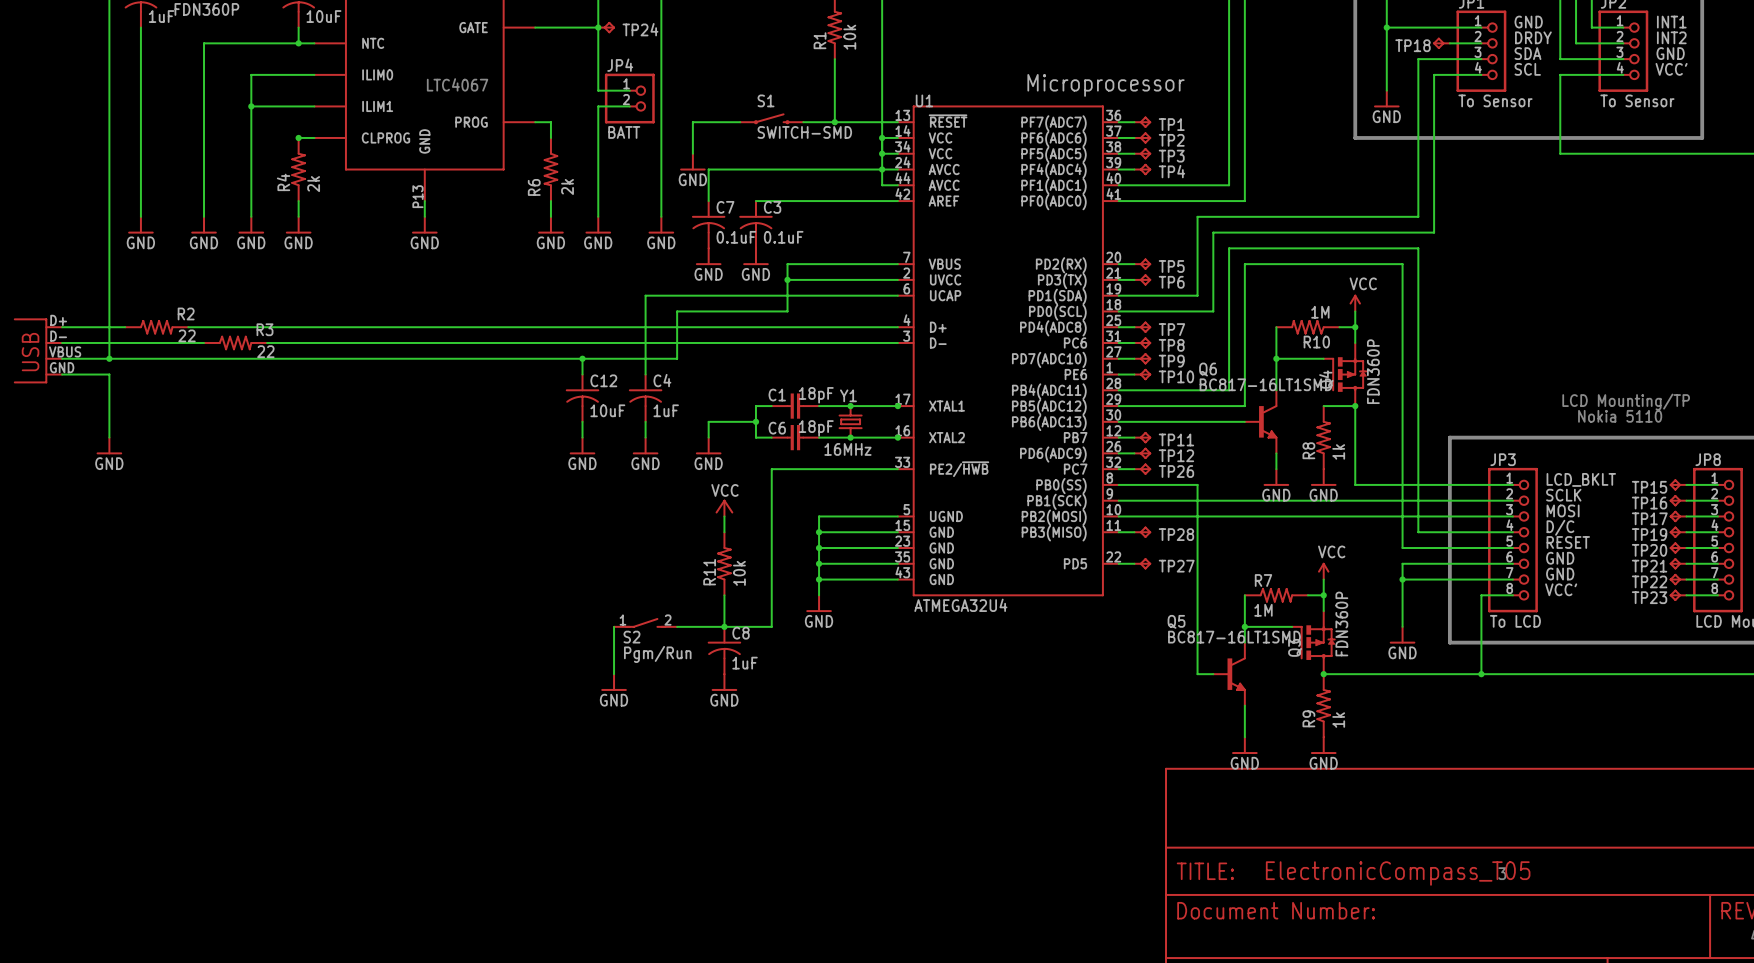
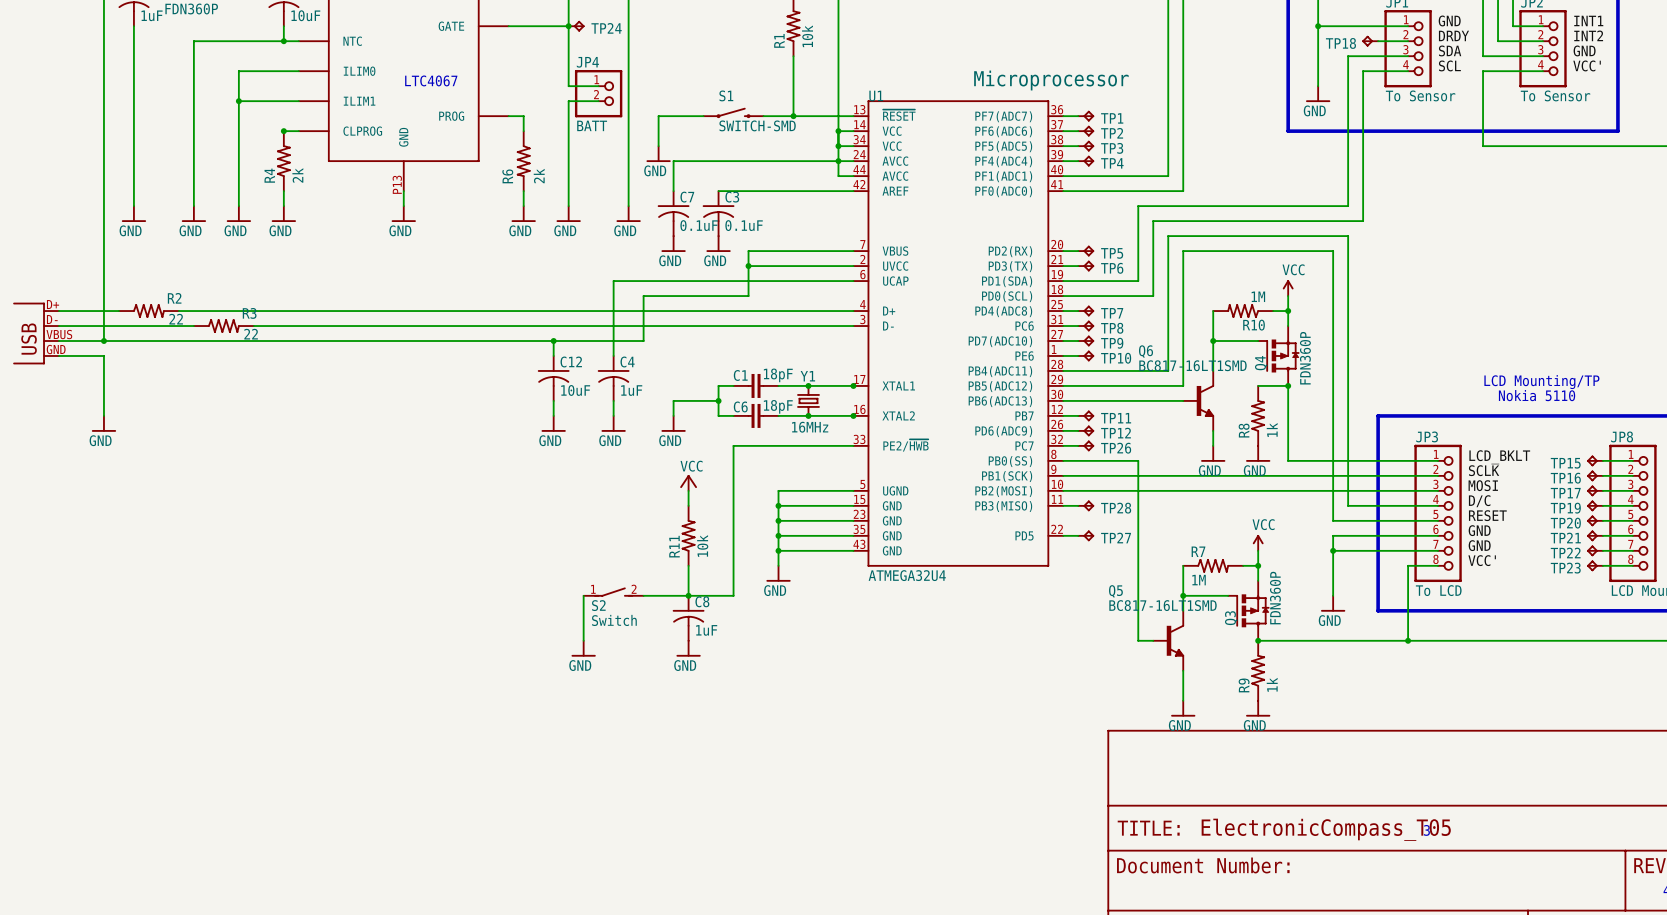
S2 value: Pgm/Run (657, 654) -> Switch (614, 620)

